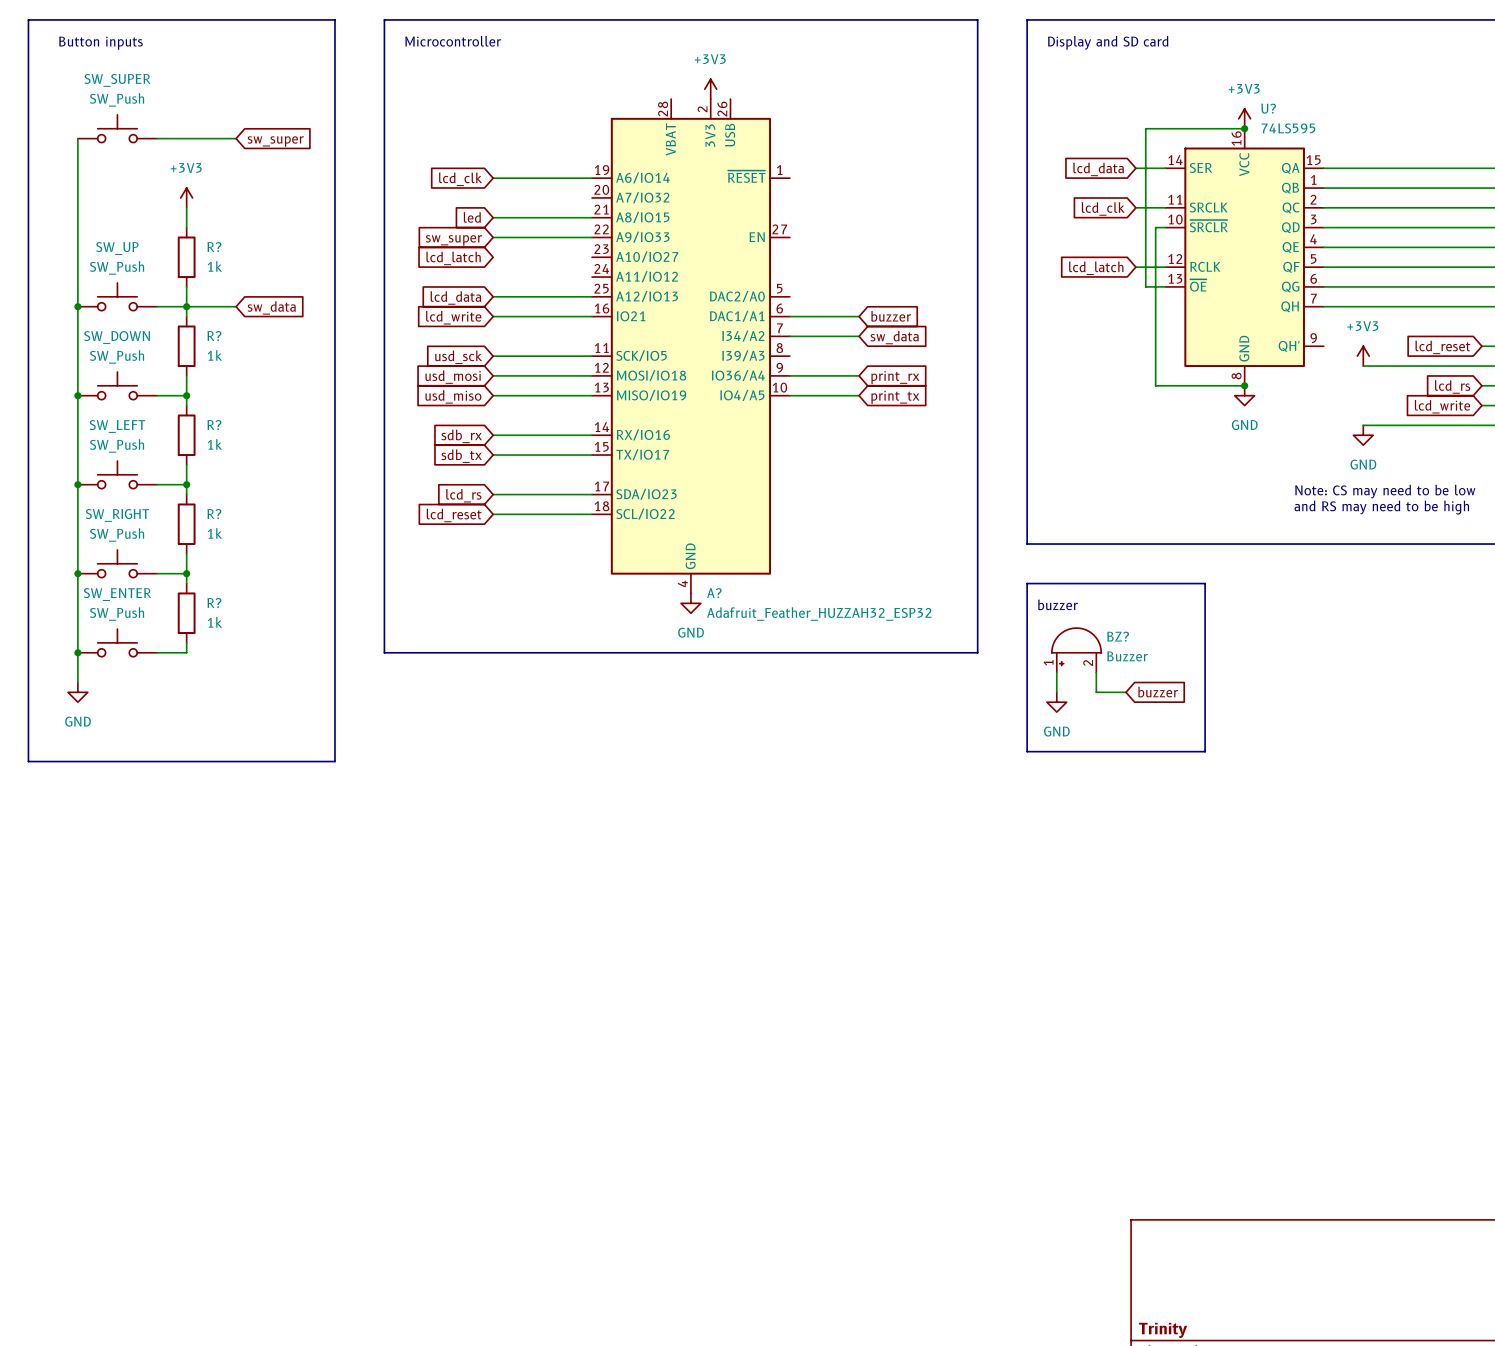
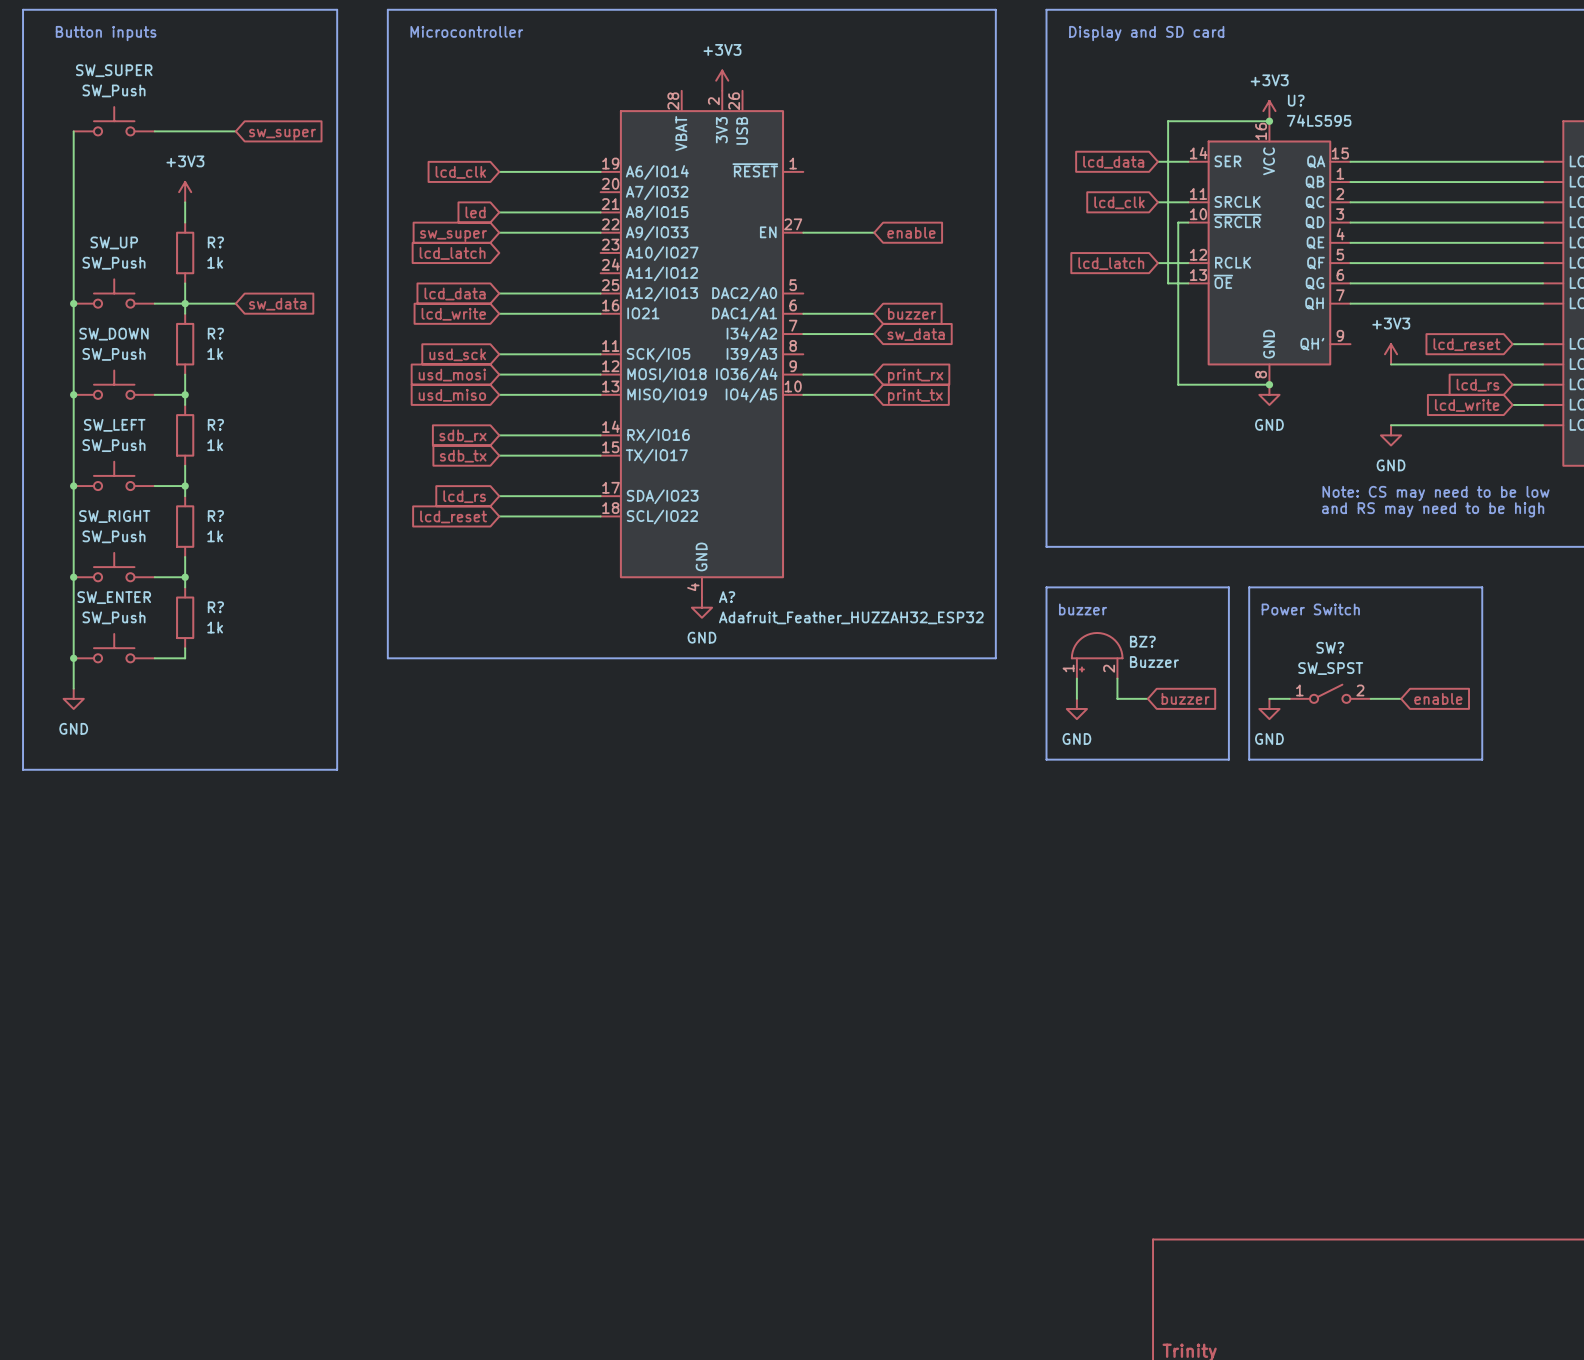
wire: none -> (803, 232) (874, 232)
global label: none -> enable (911, 232)
line: none -> (1249, 587) (1249, 759) (1482, 759) (1482, 587) (1249, 587)
text: none -> Power Switch (1310, 609)
SW?: none -> SW_SPST (1330, 693)
wire: none -> (1269, 698) (1289, 698)
wire: none -> (1370, 698) (1401, 698)
global label: none -> enable (1438, 698)
power symbol: none -> GND (1269, 708)

